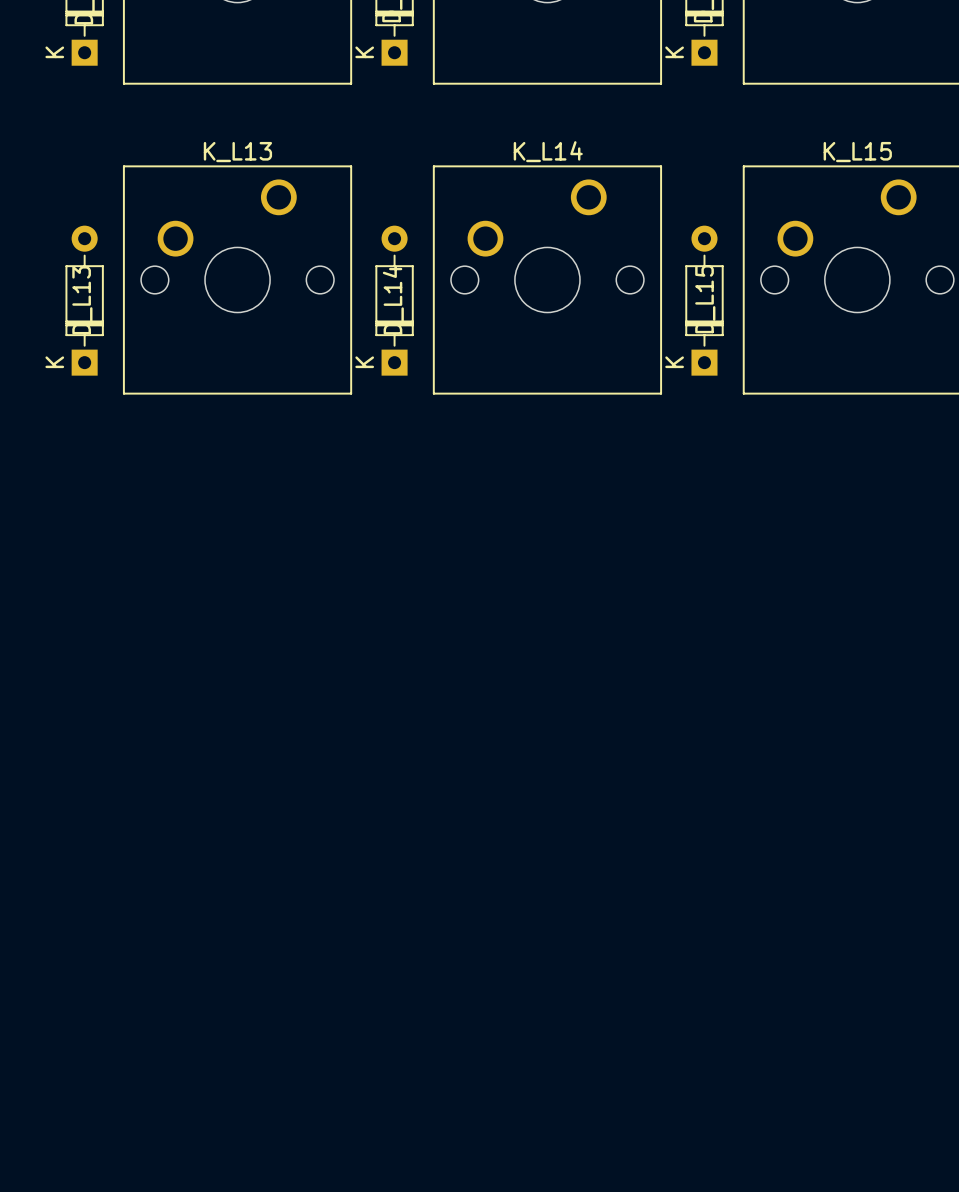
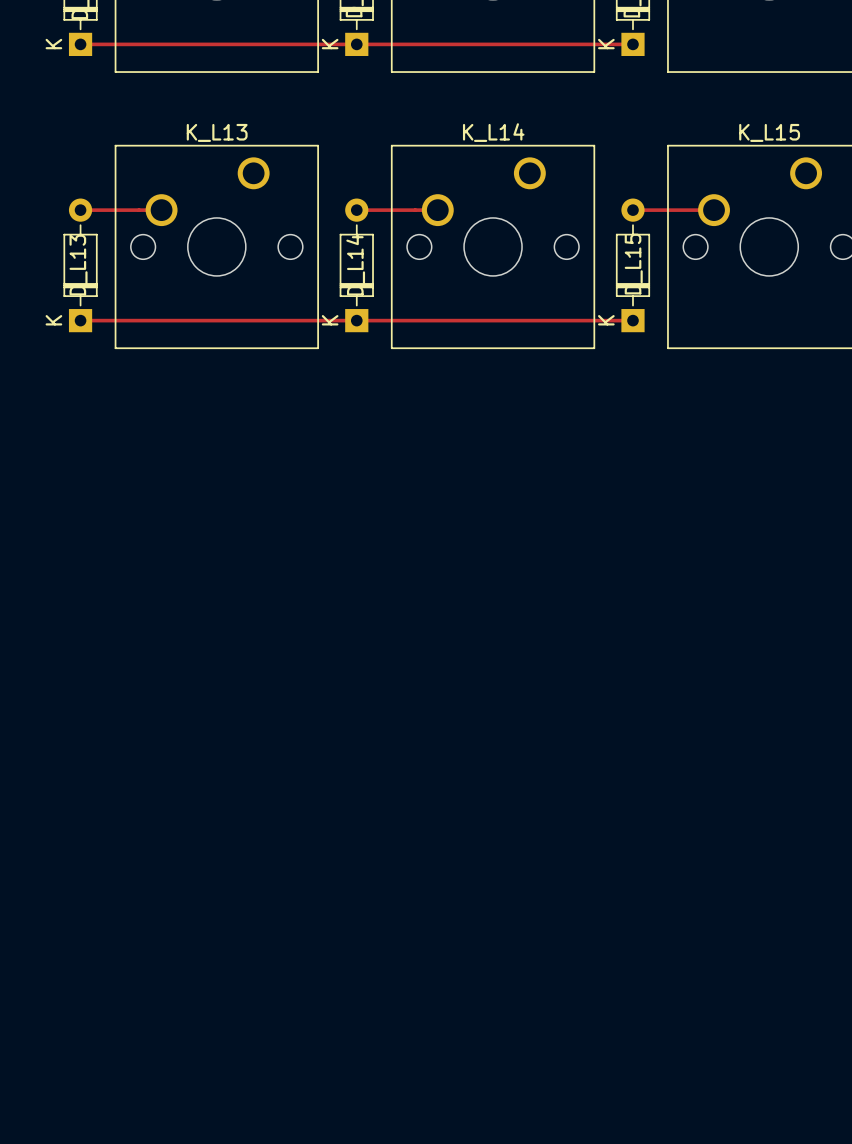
track: none -> (80, 44) (632, 44)
track: none -> (80, 210) (161, 210)
track: none -> (356, 210) (437, 210)
track: none -> (632, 210) (714, 210)
track: none -> (80, 320) (632, 320)

